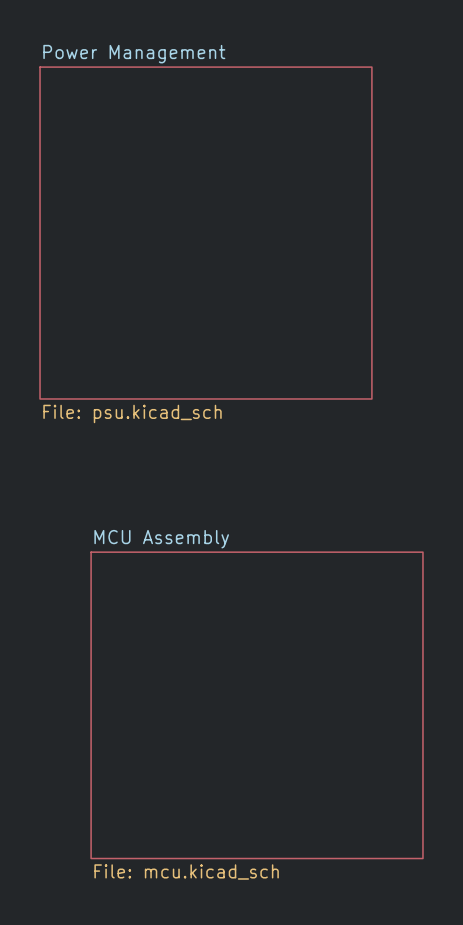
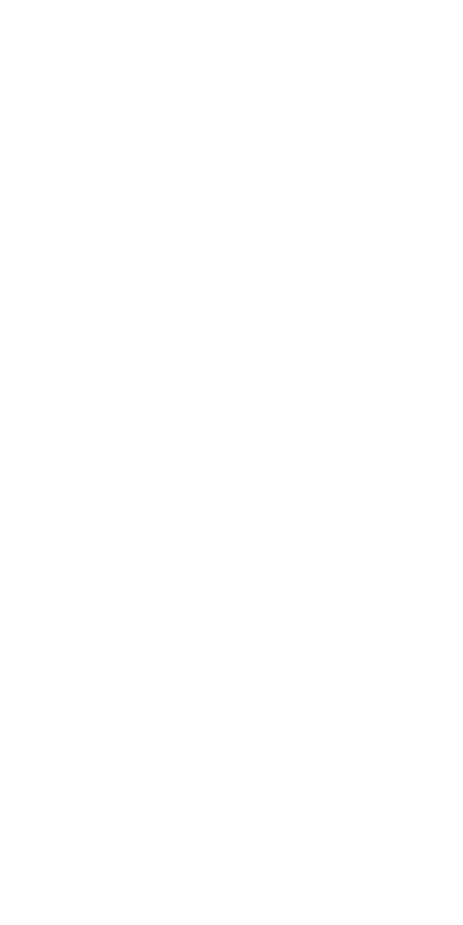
sheet Power Management: File: psu.kicad_sch (205, 233) -> none
sheet MCU Assembly: File: mcu.kicad_sch (257, 705) -> none

